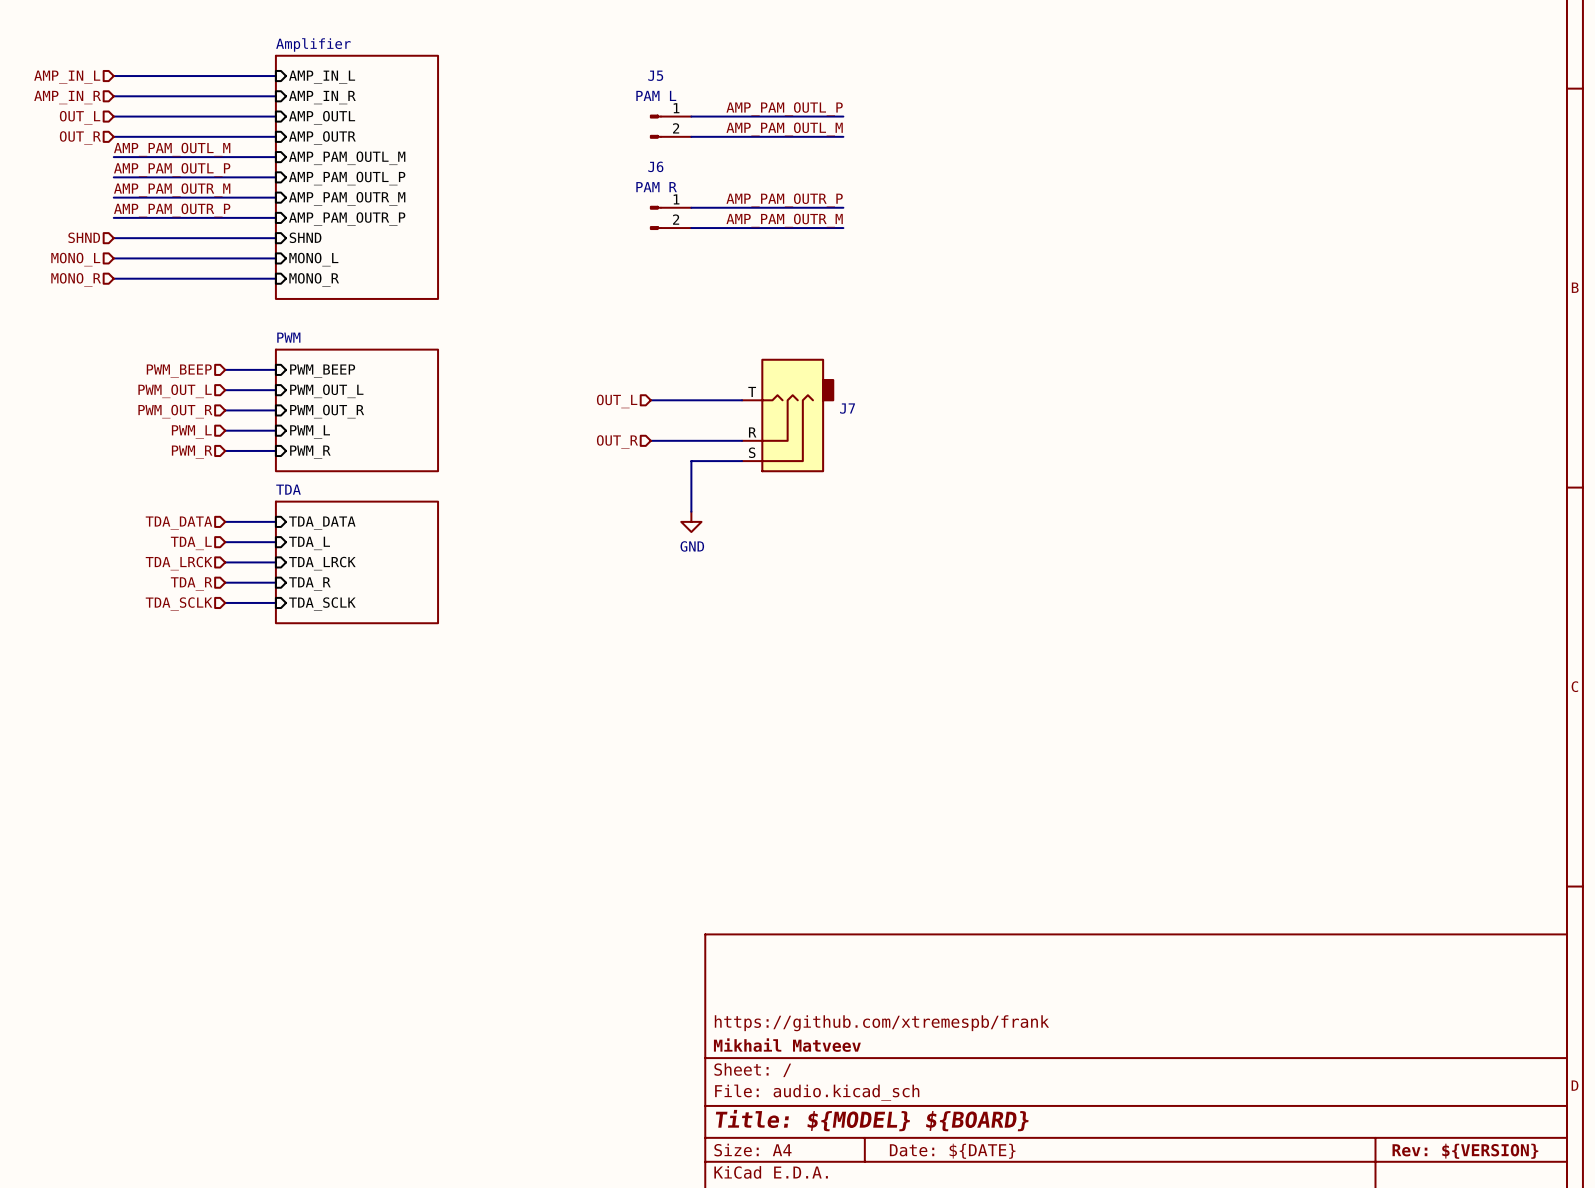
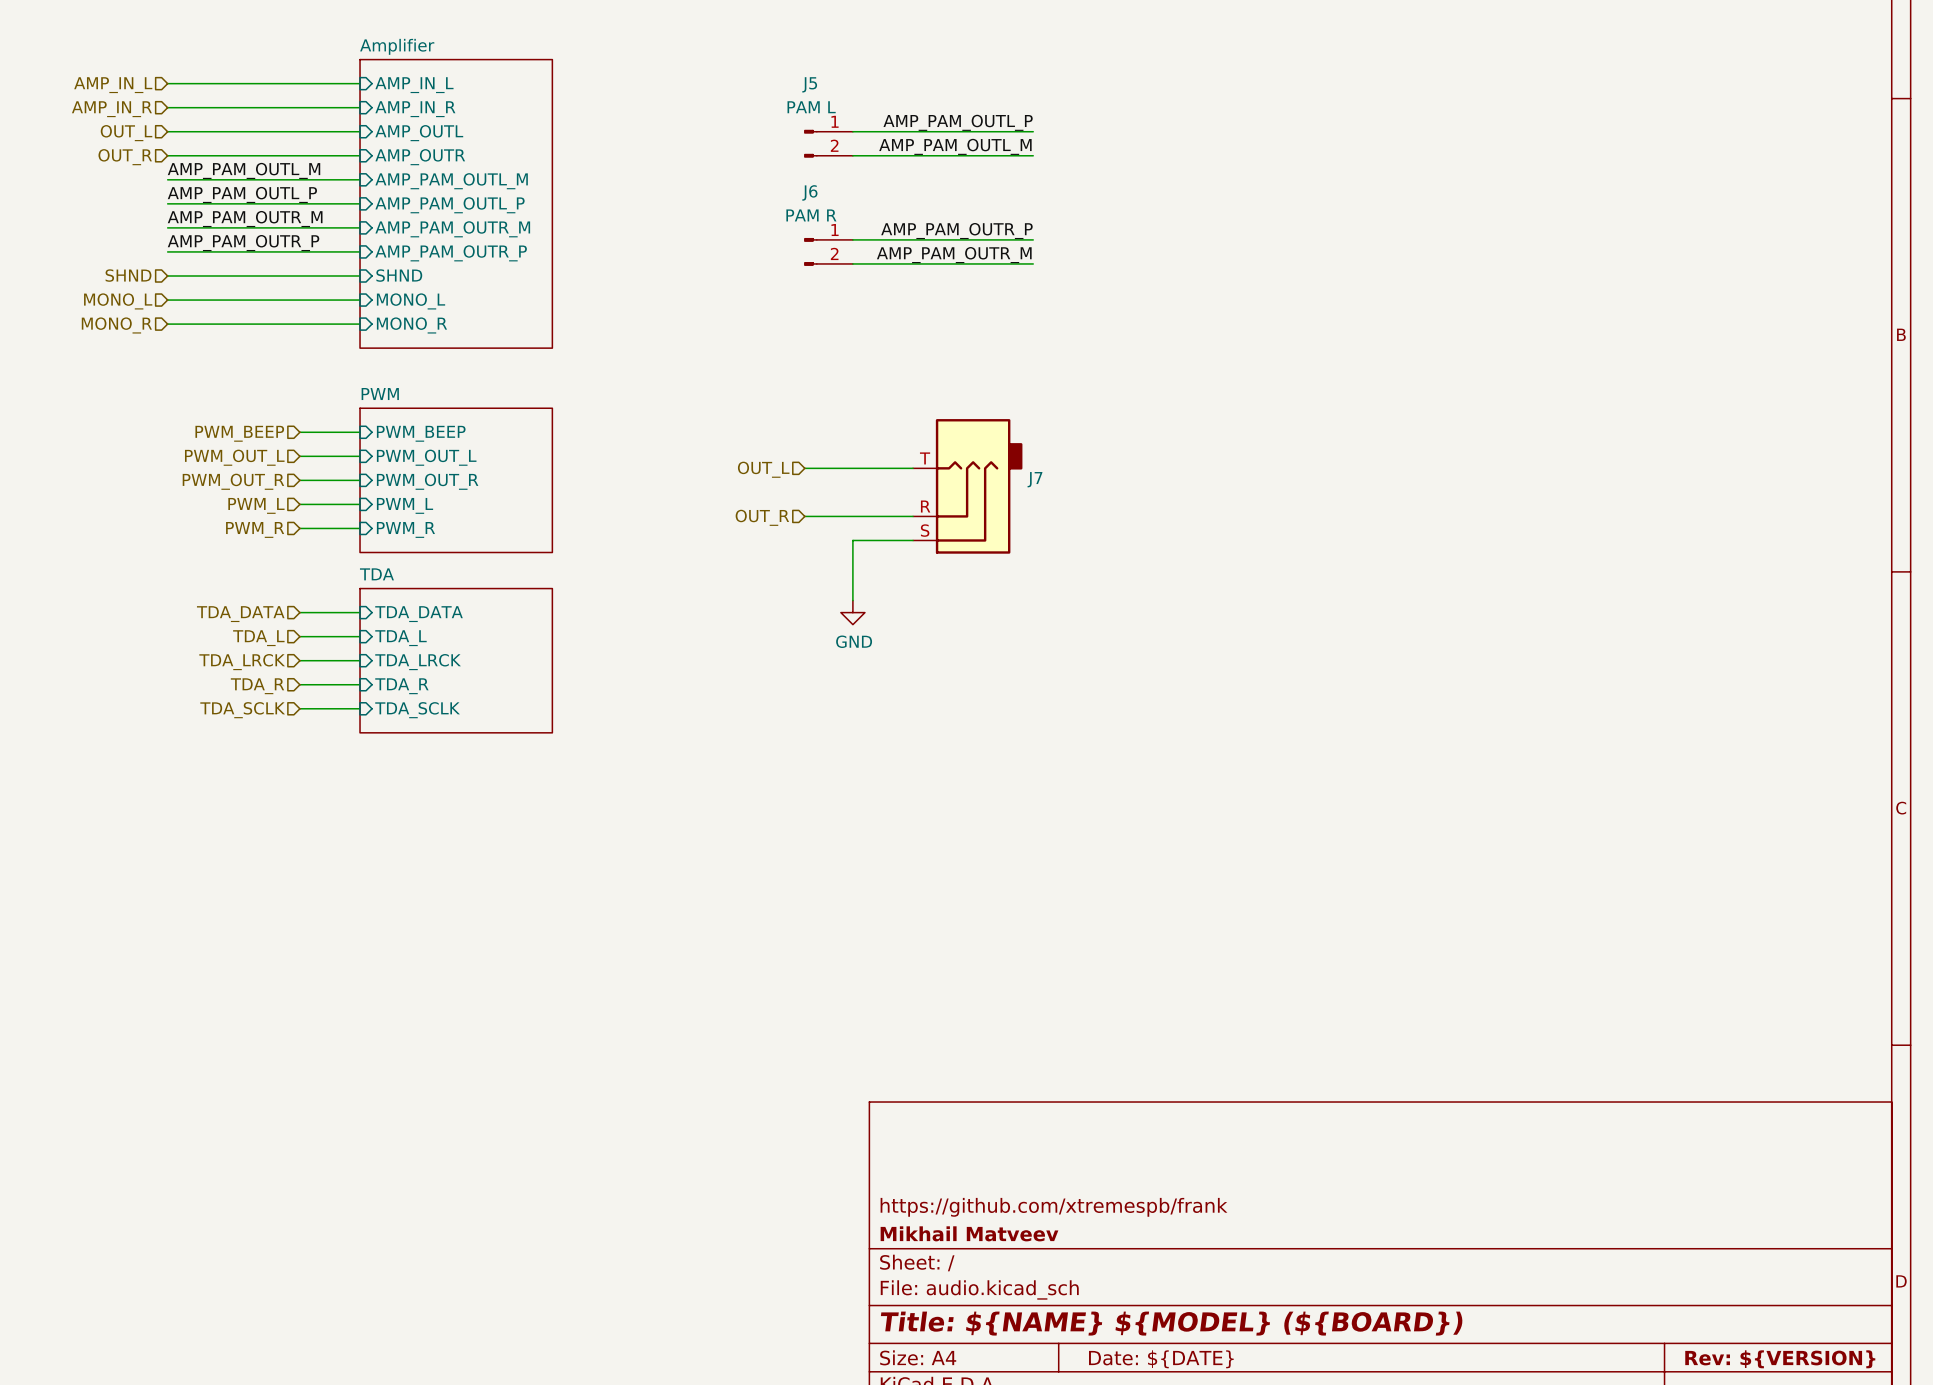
title block: Title: ${MODEL} ${BOARD} (872, 1120) -> Title: ${NAME} ${MODEL} (${BOARD}) (1171, 1323)

